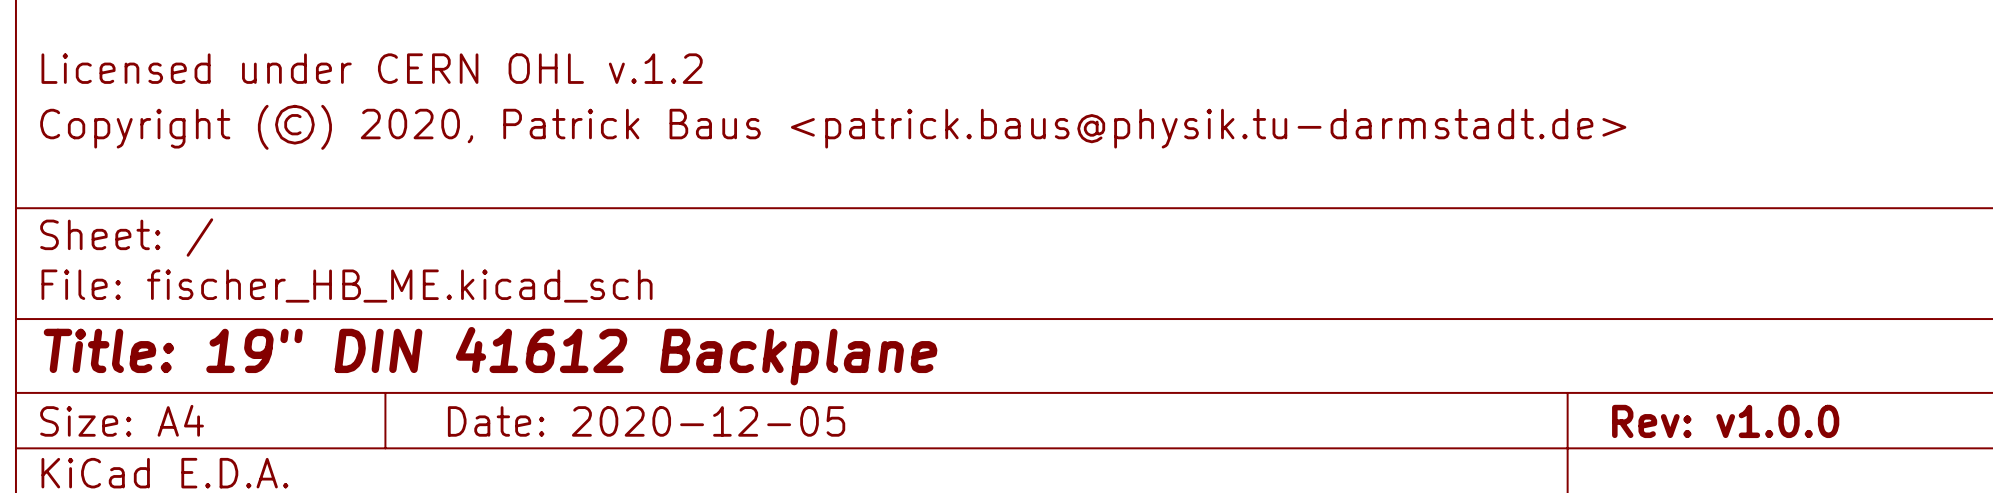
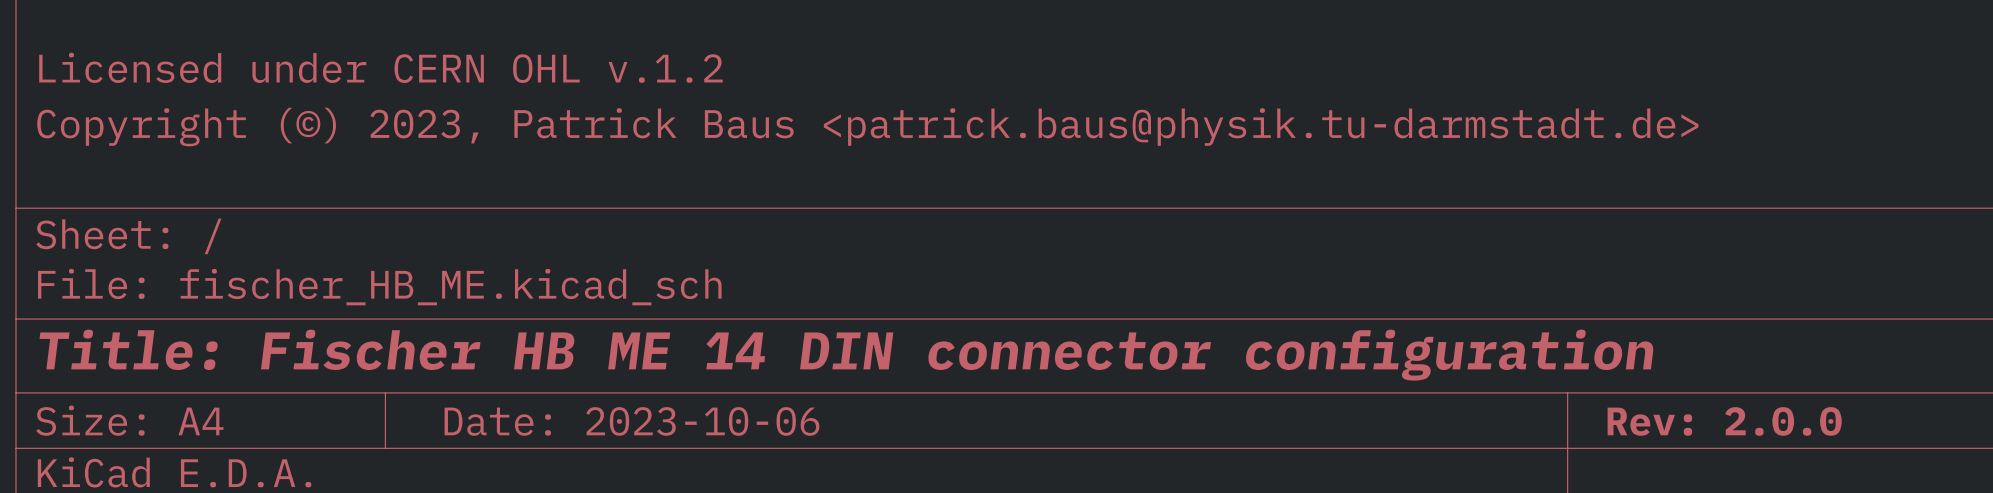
title block: Copyright (©) 2020, Patrick Baus <patrick.baus@physik.tu-darmstadt.de> (833, 127) -> Copyright (©) 2023, Patrick Baus <patrick.baus@physik.tu-darmstadt.de> (867, 127)
title block: Title: 19" DIN 41612 Backplane (490, 356) -> Title: Fischer HB ME 14 DIN connector configuration (846, 355)
title block: Date: 2020-12-05 (646, 421) -> Date: 2023-10-06 (632, 421)
title block: Rev: v1.0.0 (1725, 421) -> Rev: 2.0.0 (1724, 421)

